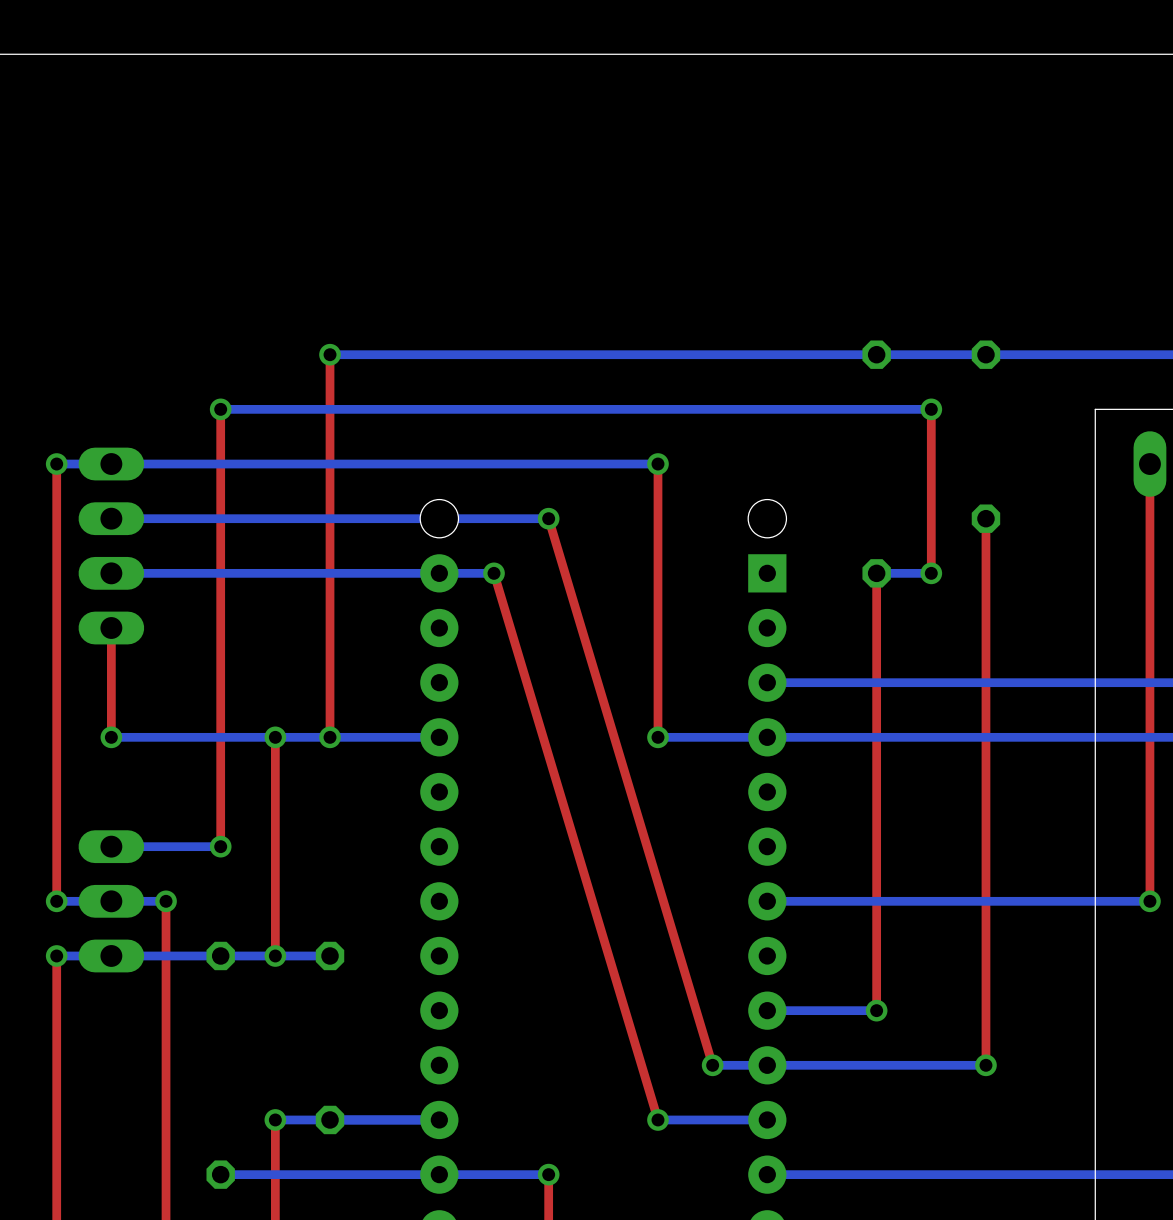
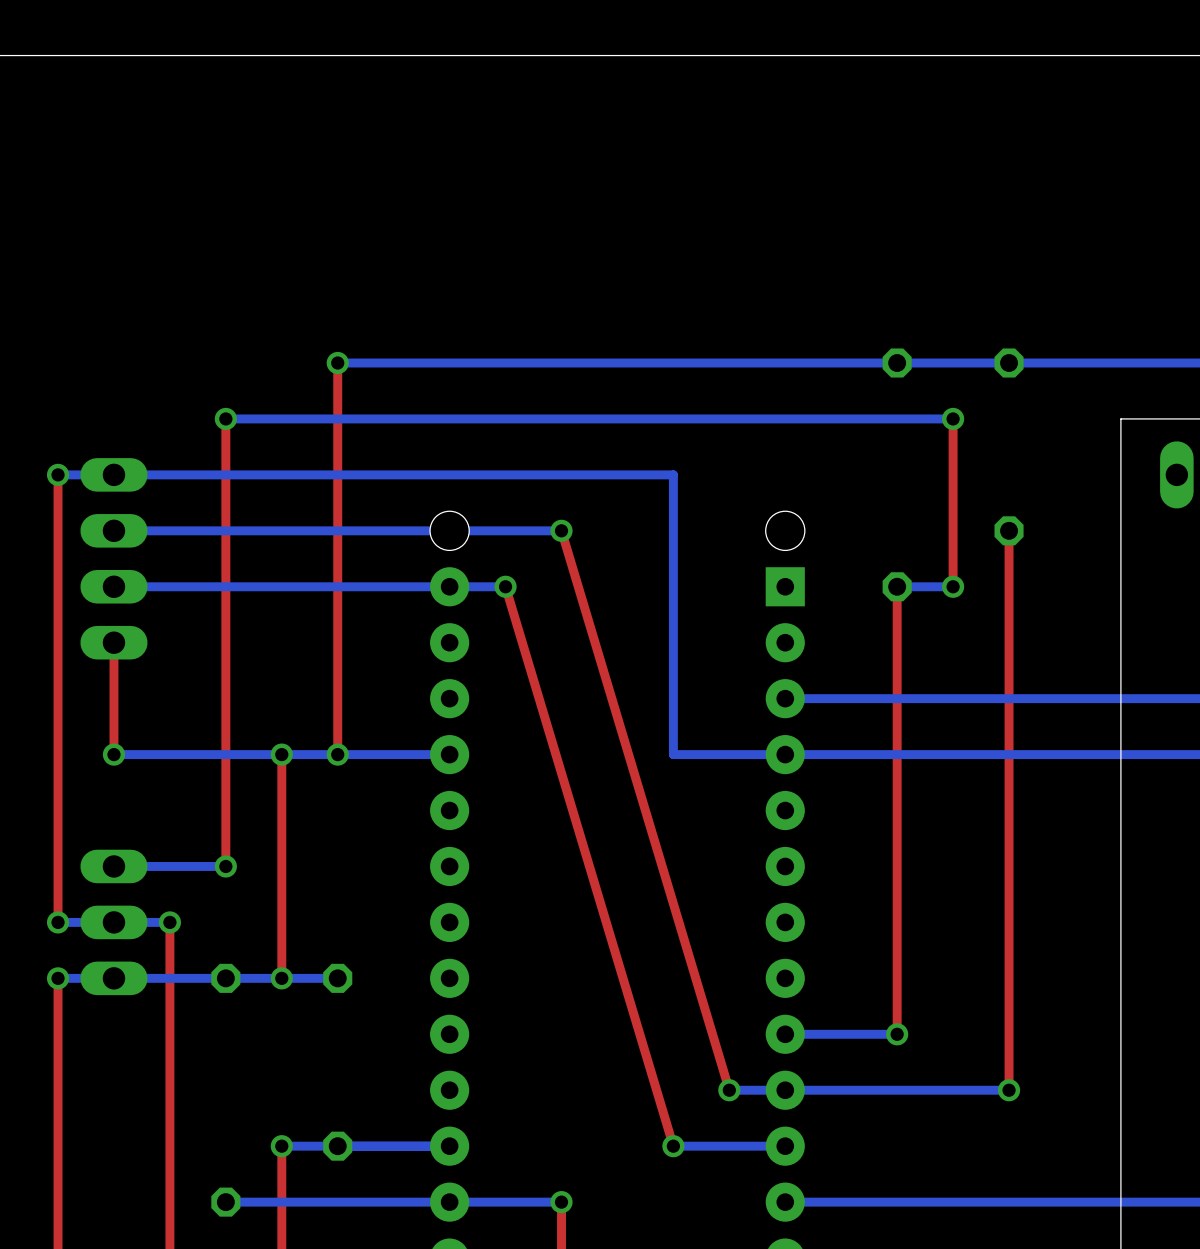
bottom track: none -> (673, 474) (673, 754)
top track: (657, 464) (657, 737) -> none
via: (657, 464) -> none
top track: (1149, 464) (1149, 901) -> none
via: (657, 737) -> none
bottom track: (1149, 901) (767, 901) -> none
via: (1149, 901) -> none

